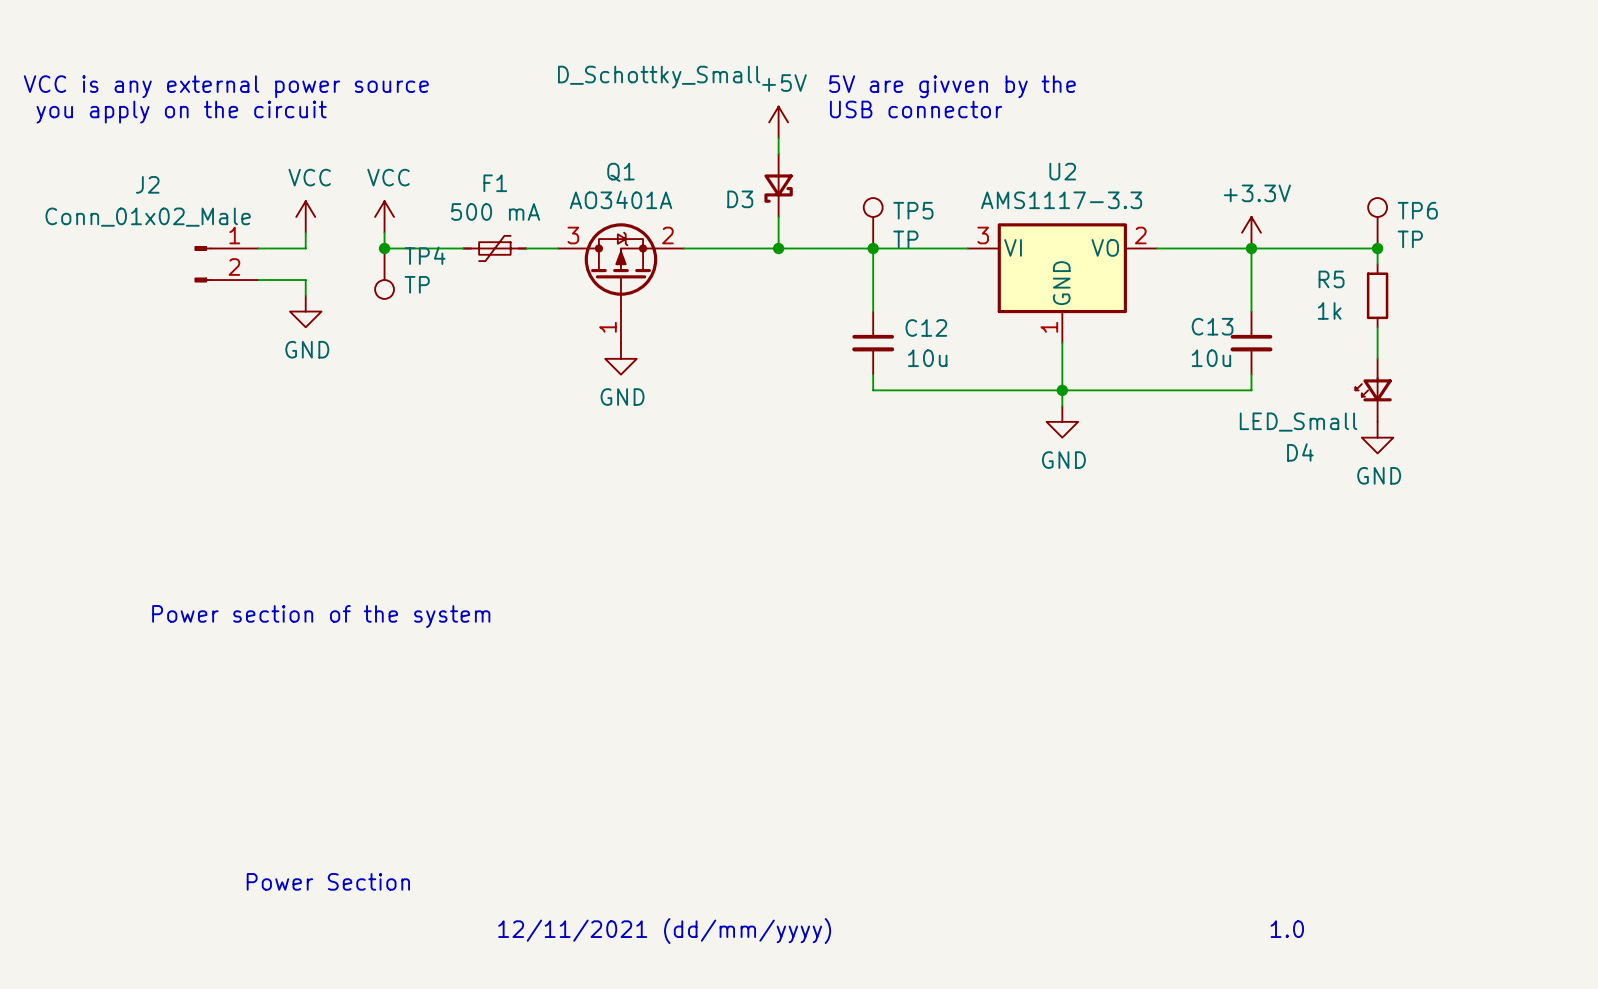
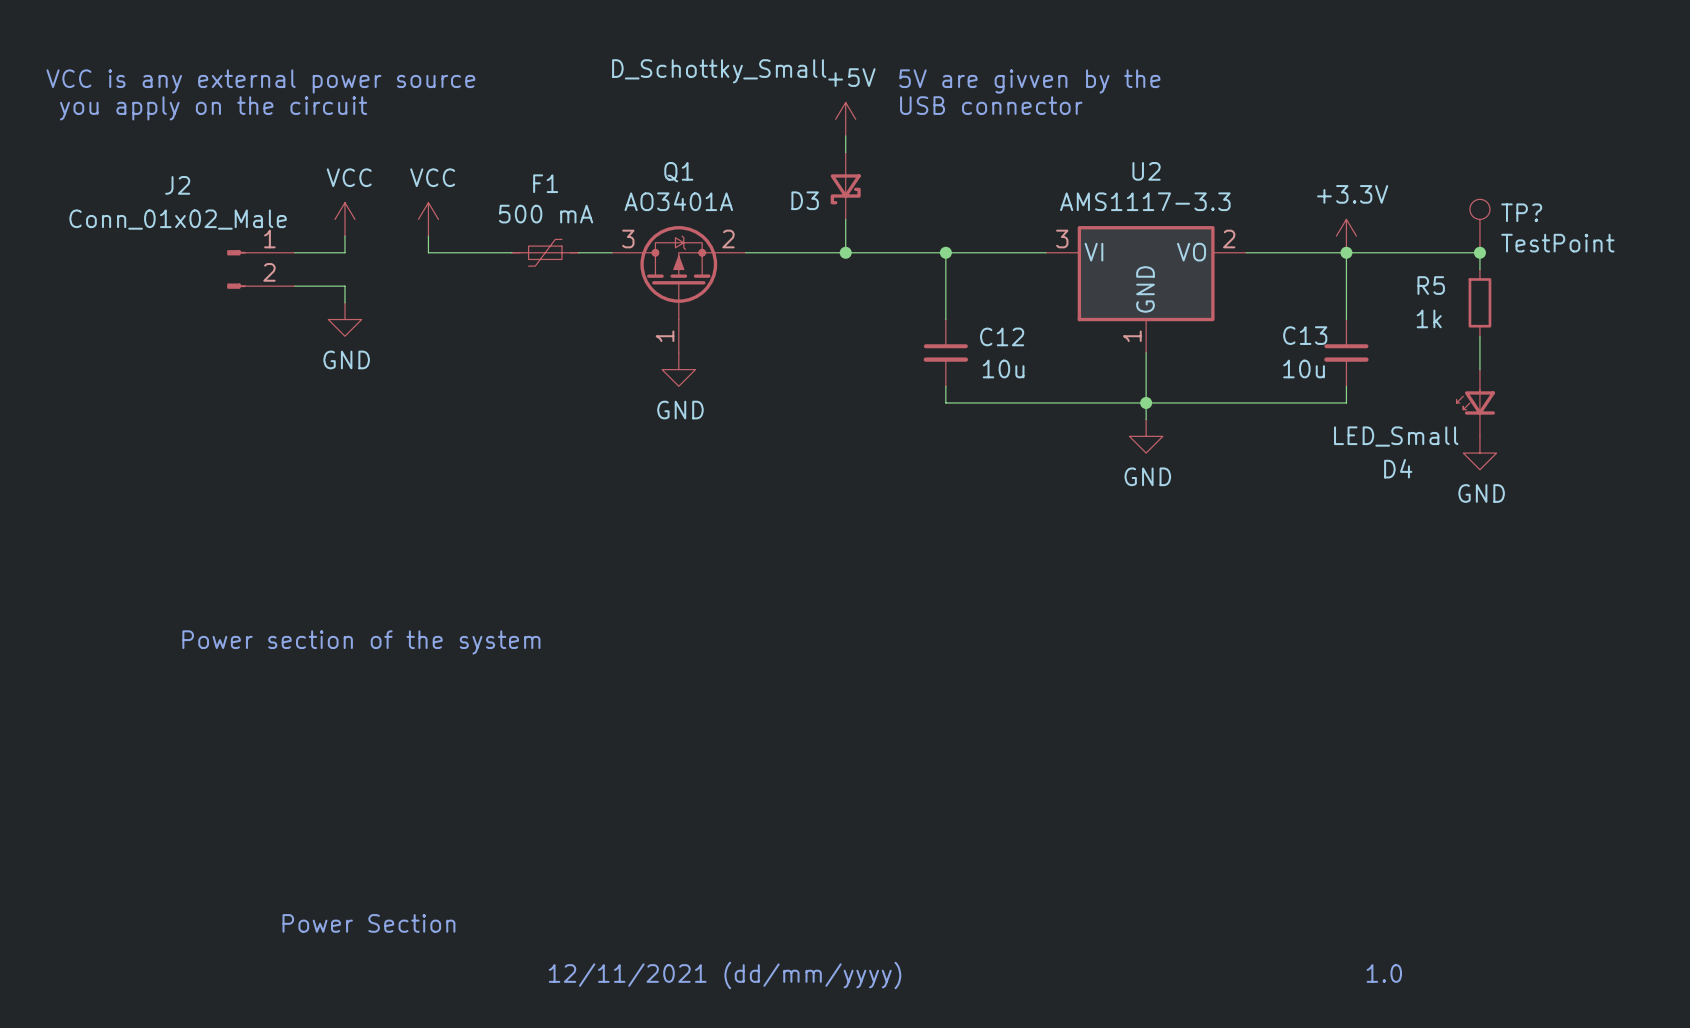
TP6 name: TP6 (1417, 210) -> TP? (1521, 212)
TP5: TP (873, 223) -> none
TP6 value: TP (1410, 239) -> TestPoint (1557, 243)
junction: (384, 248) -> none
TP4: TP (384, 273) -> none

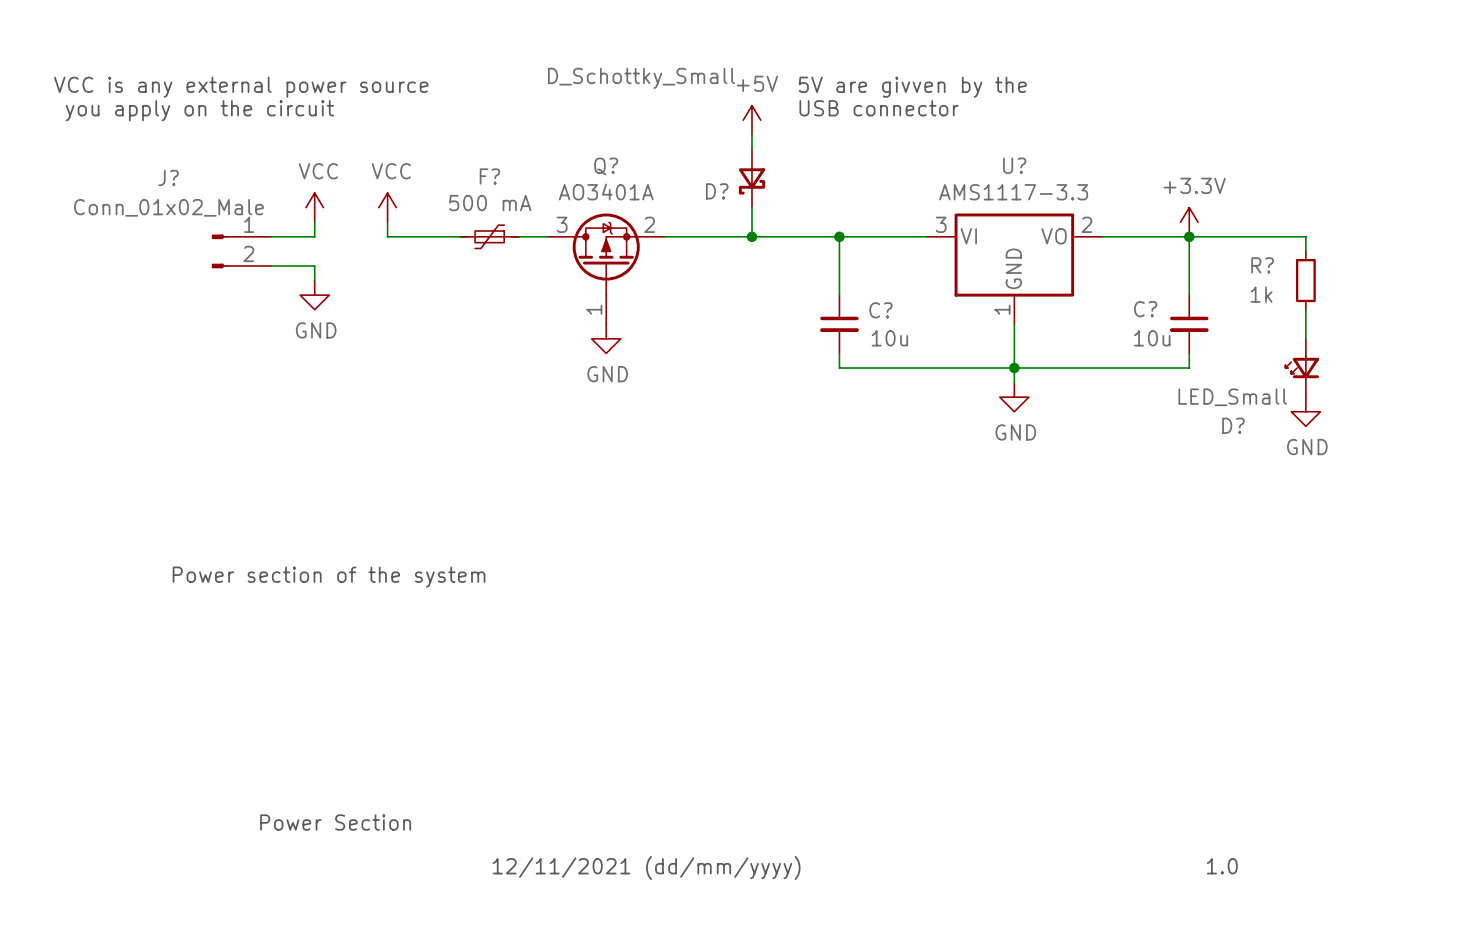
U2 name: U2 (1146, 171) -> U? (1014, 165)
Q1 name: Q1 (678, 172) -> Q? (606, 166)
F1 name: F1 (545, 183) -> F? (489, 176)
J2 name: J2 (177, 185) -> J? (168, 177)
D3 name: D3 (805, 200) -> D? (717, 191)
TP?: TestPoint (1479, 226) -> none
junction: (1479, 252) -> none
R5 name: R5 (1431, 285) -> R? (1262, 265)
C13 name: C13 (1305, 335) -> C? (1145, 309)
C12 name: C12 (1002, 336) -> C? (880, 310)
D4 name: D4 (1398, 468) -> D? (1233, 425)

